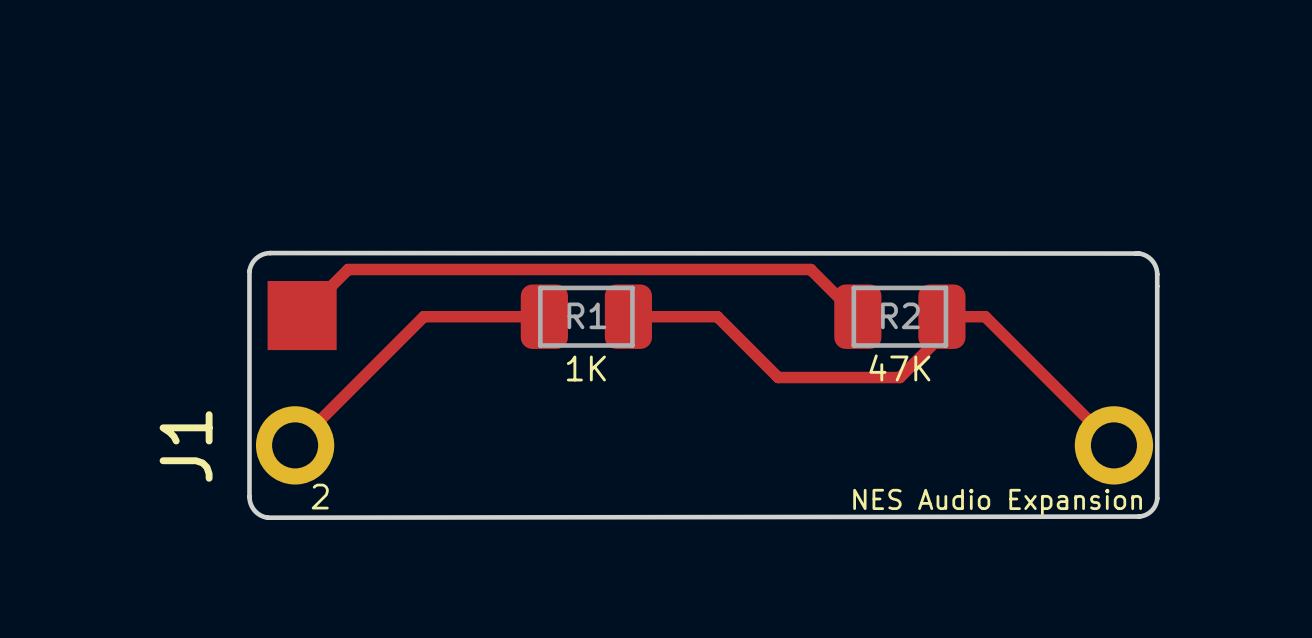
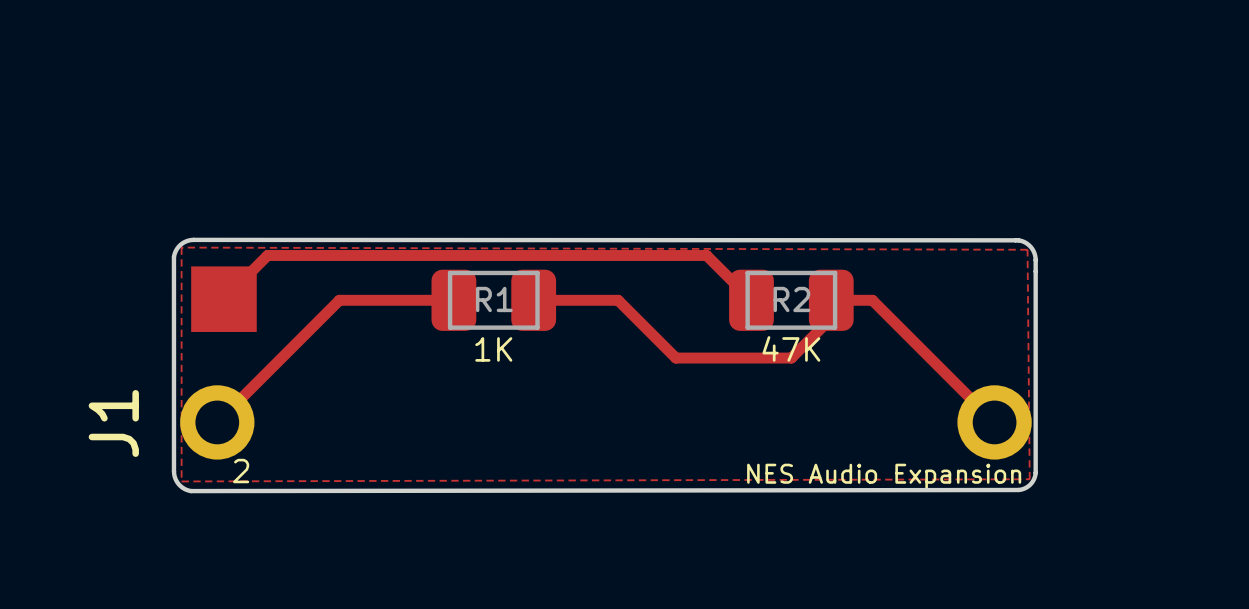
top zone outline: none -> (181, 247) (1027, 249) (1029, 479) (181, 481) (181, 247)

